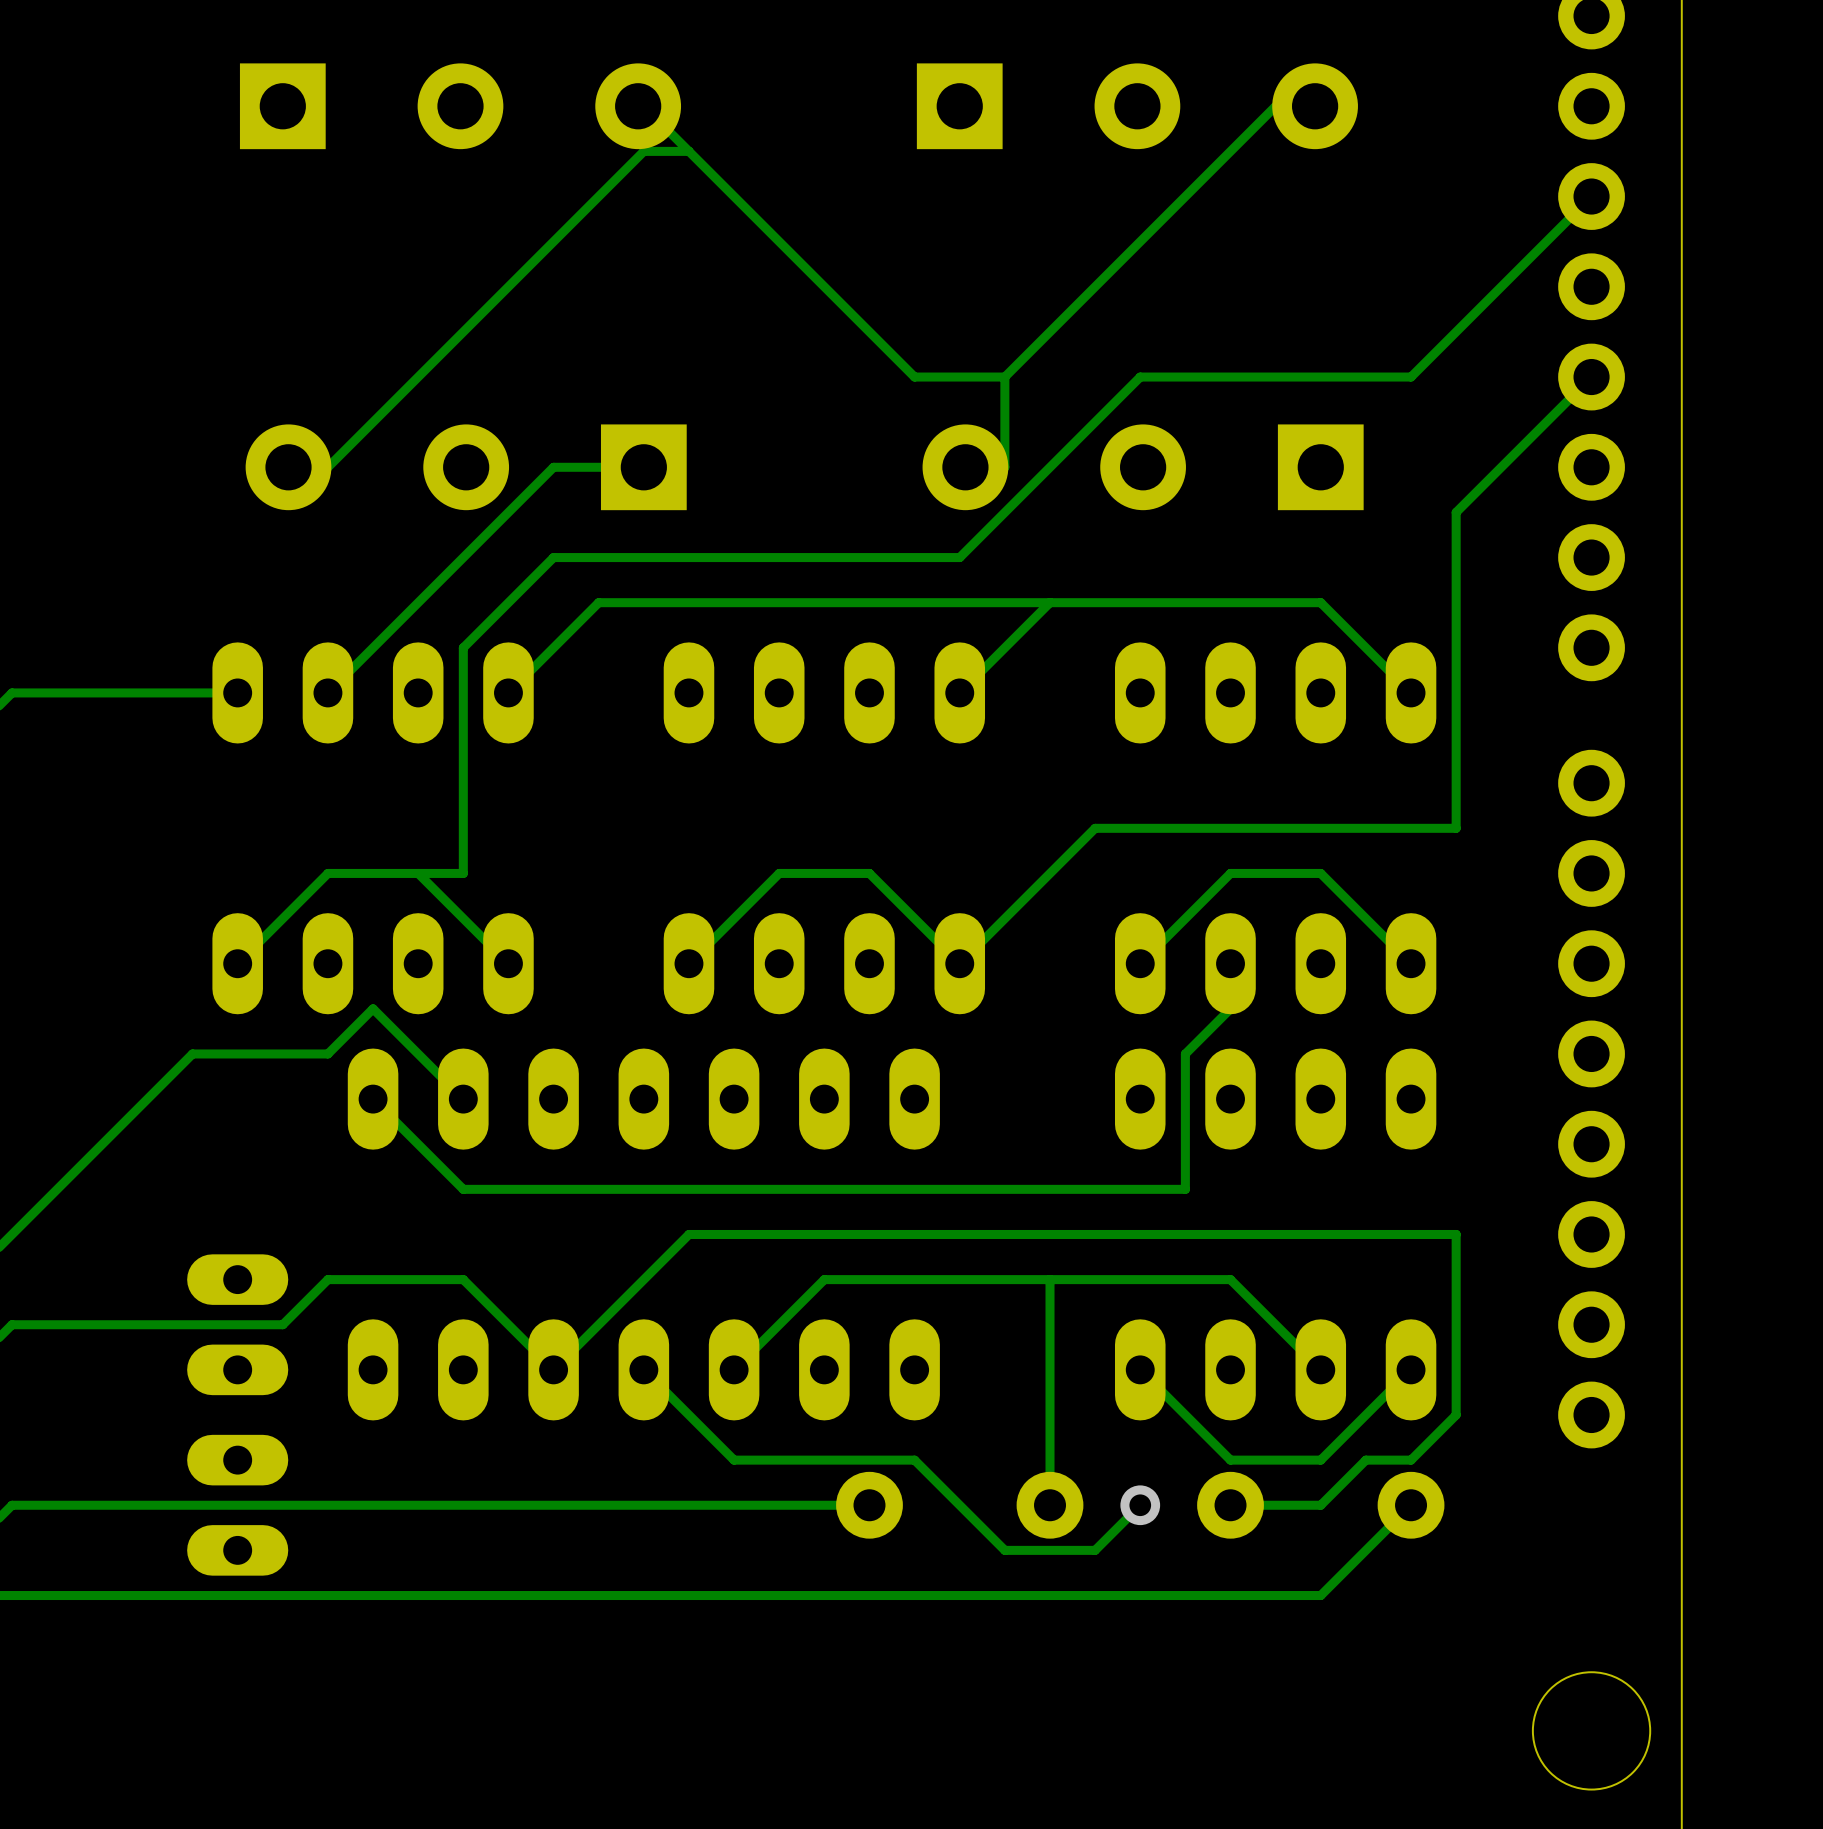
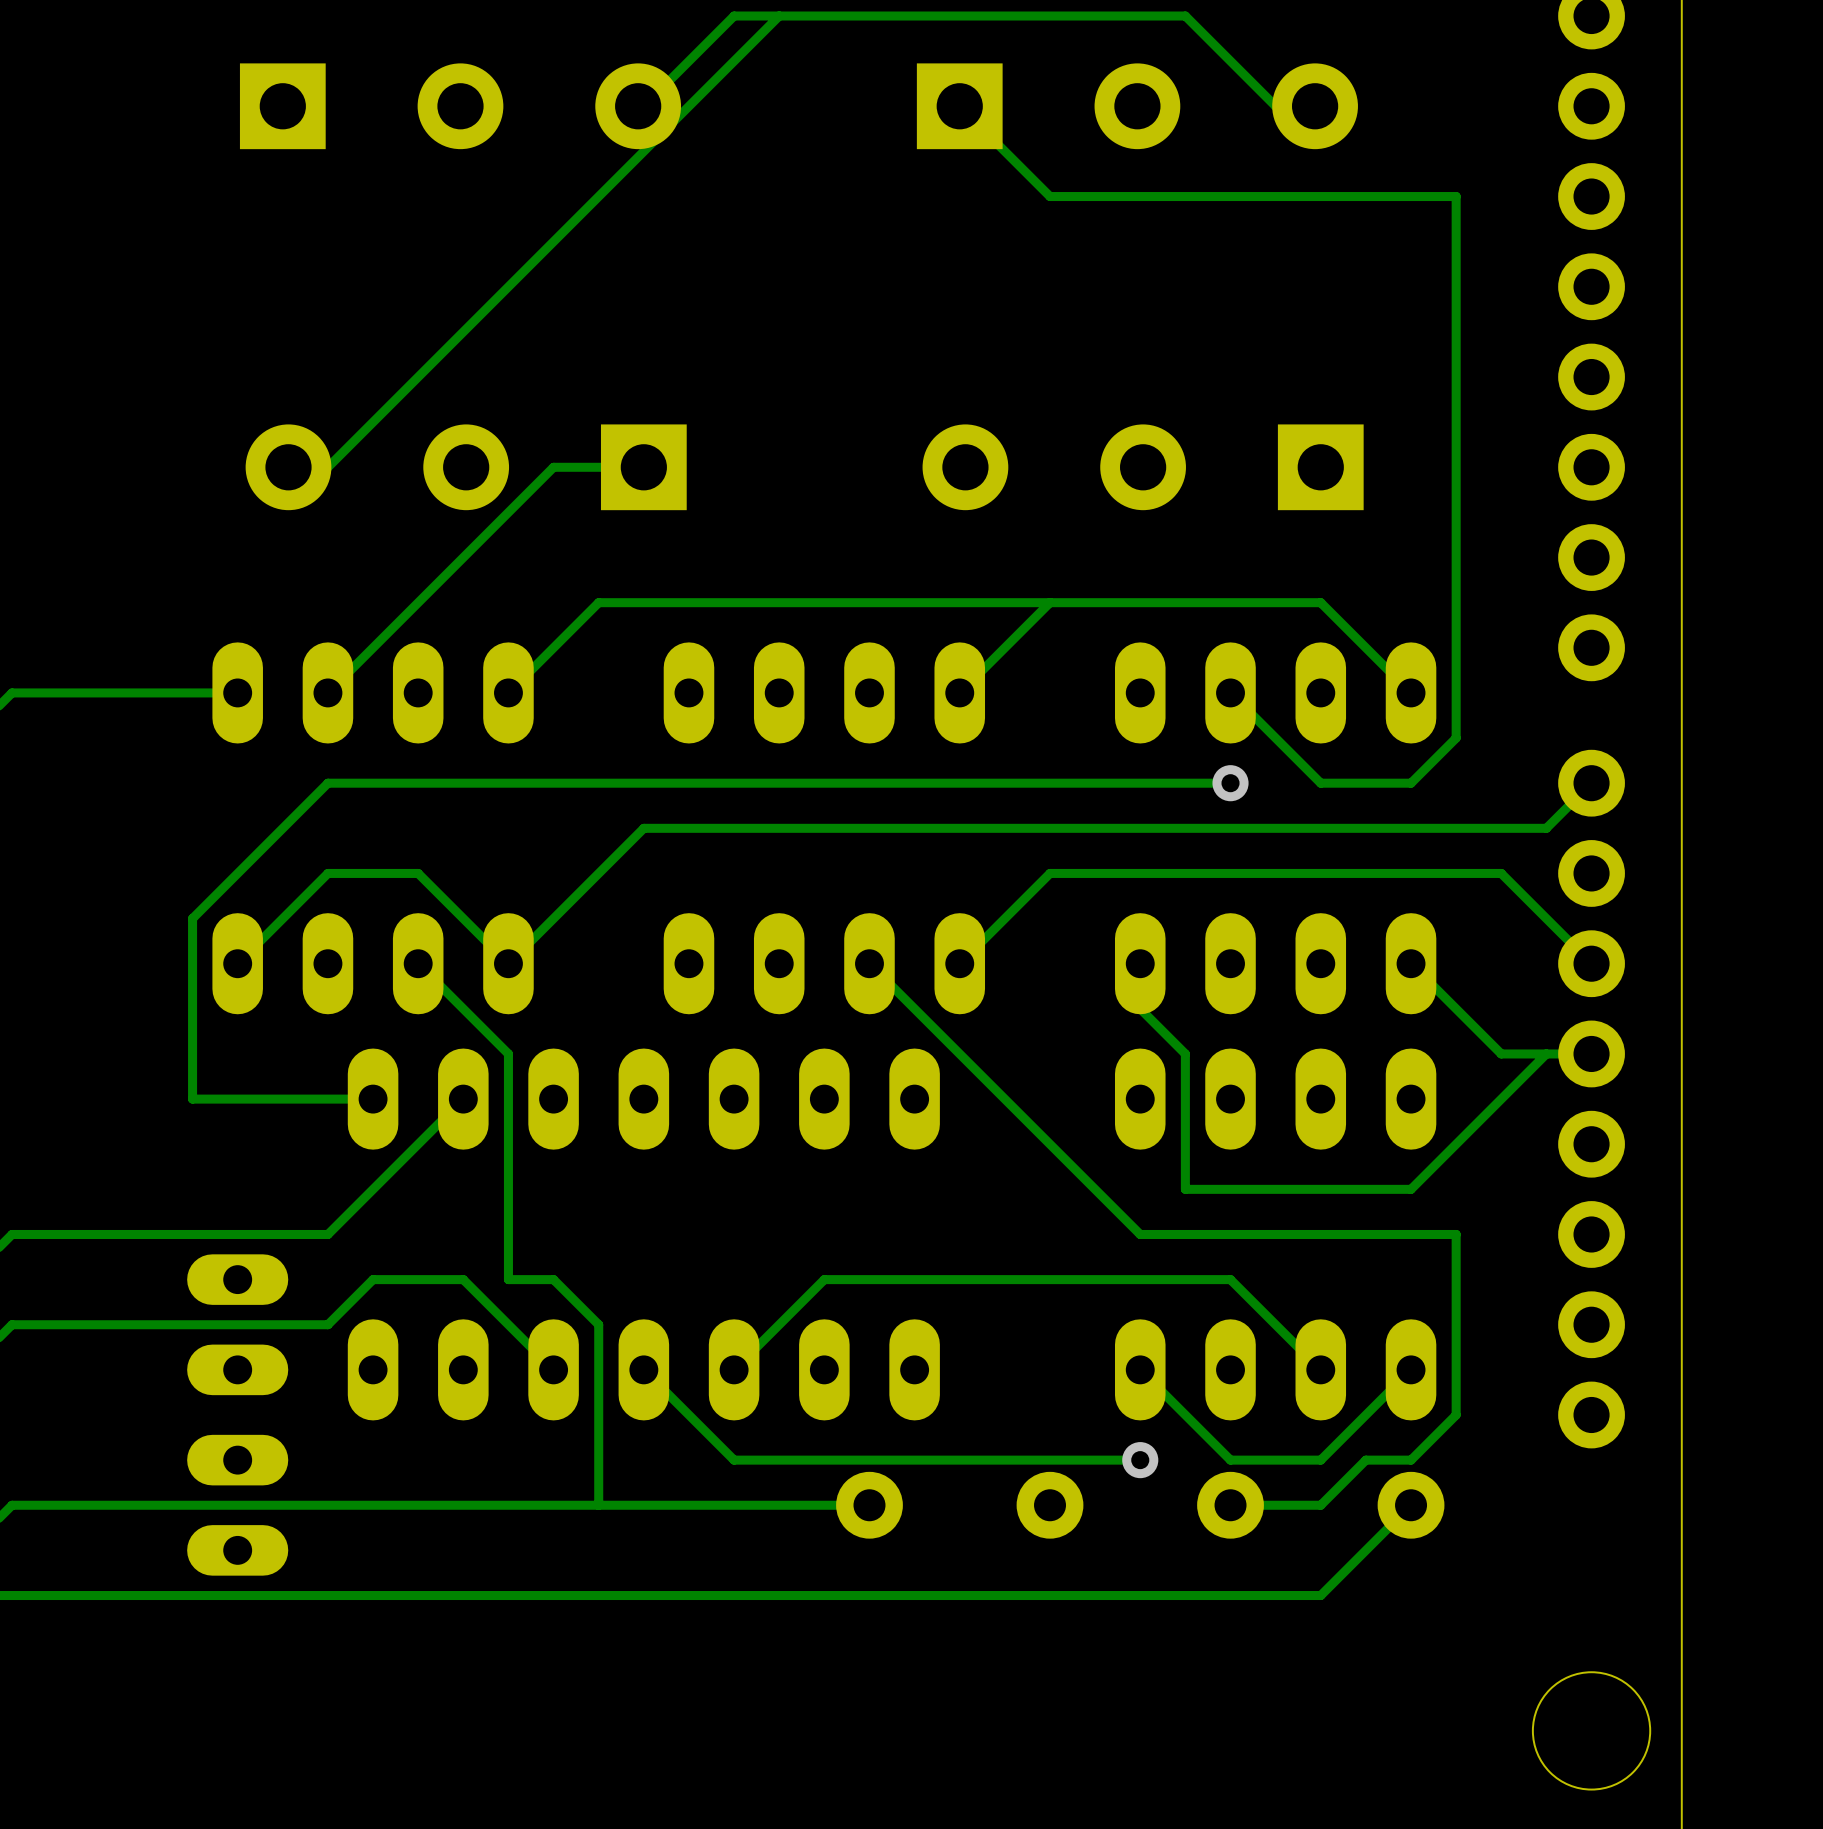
track: (643, 106) (914, 377) (1004, 377) -> (643, 106) (734, 16) (1185, 16) (1275, 106)
track: (1275, 106) (1004, 377) -> none
track: (688, 151) (643, 151) -> (779, 16) (643, 151)
track: (1591, 196) (1411, 377) (1140, 377) (959, 557) (553, 557) (463, 647) (463, 873) (418, 873) -> none
track: (1004, 377) (1004, 467) (965, 467) -> none
track: (1591, 377) (1456, 512) -> (959, 106) (1050, 196) (1456, 196) (1456, 512)
track: none -> (1230, 692) (1320, 783) (1411, 783) (1456, 738)
track: (1456, 738) (1456, 828) -> (1591, 783) (1546, 828) (1456, 828)
via: none -> (1230, 783)
track: (1095, 828) (1050, 873) -> (1095, 828) (643, 828) (508, 963)
track: (1230, 873) (1140, 963) -> (1230, 873) (1050, 873)
track: (1320, 873) (1411, 963) -> (1320, 873) (1501, 873) (1591, 963)
track: none -> (418, 963) (508, 1053) (508, 1279) (553, 1279) (598, 1324) (598, 1505)
track: (959, 963) (869, 873) (779, 873) (688, 963) -> none
track: (1230, 963) (1230, 1008) (1185, 1053) -> (1140, 963) (1140, 1008) (1185, 1053)
track: none -> (1411, 963) (1501, 1053) (1591, 1053)
track: none -> (1546, 1053) (1411, 1189) (1185, 1189)
track: (373, 1099) (463, 1189) (1185, 1189) -> (373, 1099) (192, 1099) (192, 918) (327, 783) (1230, 783)
track: (463, 1099) (373, 1008) (327, 1053) (192, 1053) (12, 1234) -> (463, 1099) (327, 1234) (12, 1234)
track: (1140, 1234) (688, 1234) (553, 1369) -> (1140, 1234) (869, 963)
track: (373, 1279) (327, 1279) (282, 1324) -> (373, 1279) (327, 1324) (282, 1324)
track: (1050, 1279) (1050, 1505) -> none
track: (914, 1460) (1004, 1550) (1095, 1550) (1140, 1505) -> (914, 1460) (1140, 1460)
via: none -> (1140, 1460)
via: (1140, 1505) -> none

